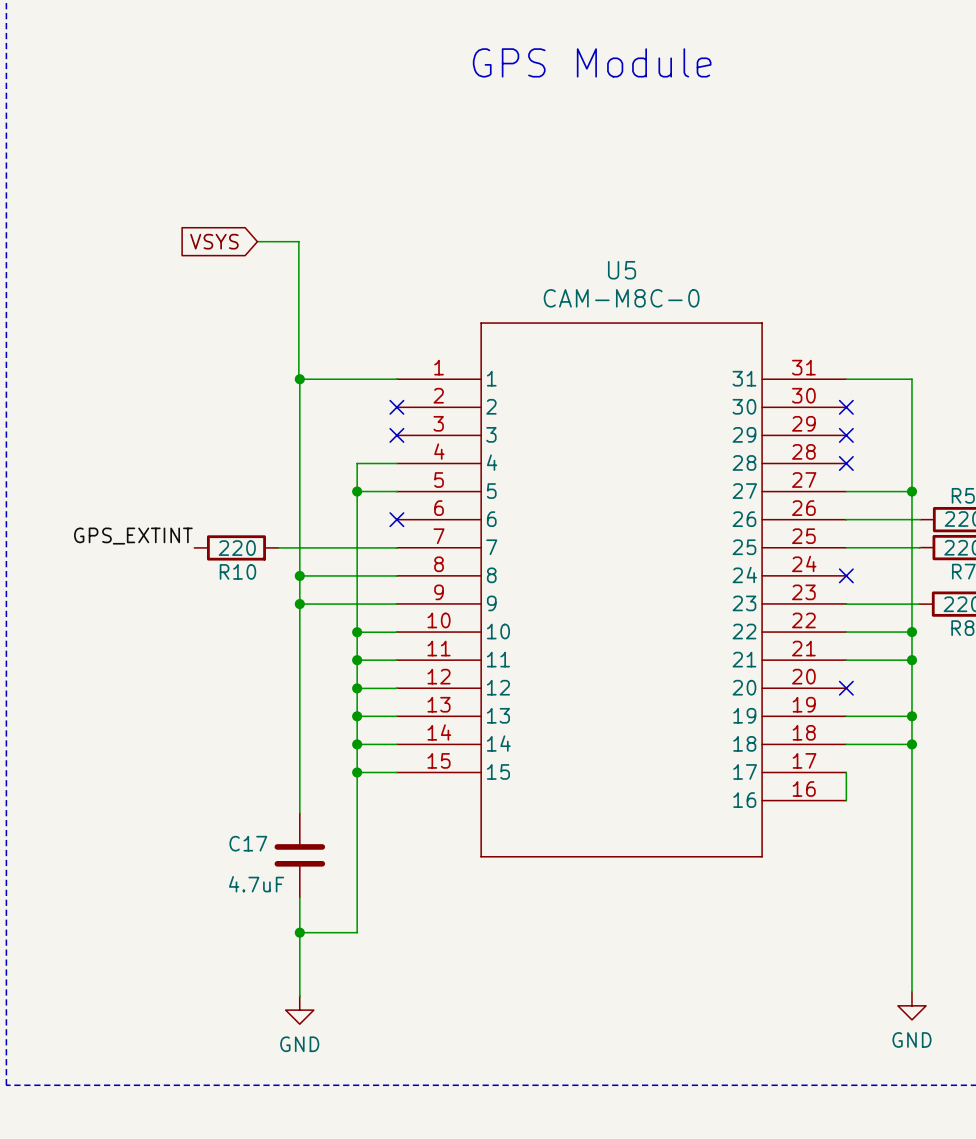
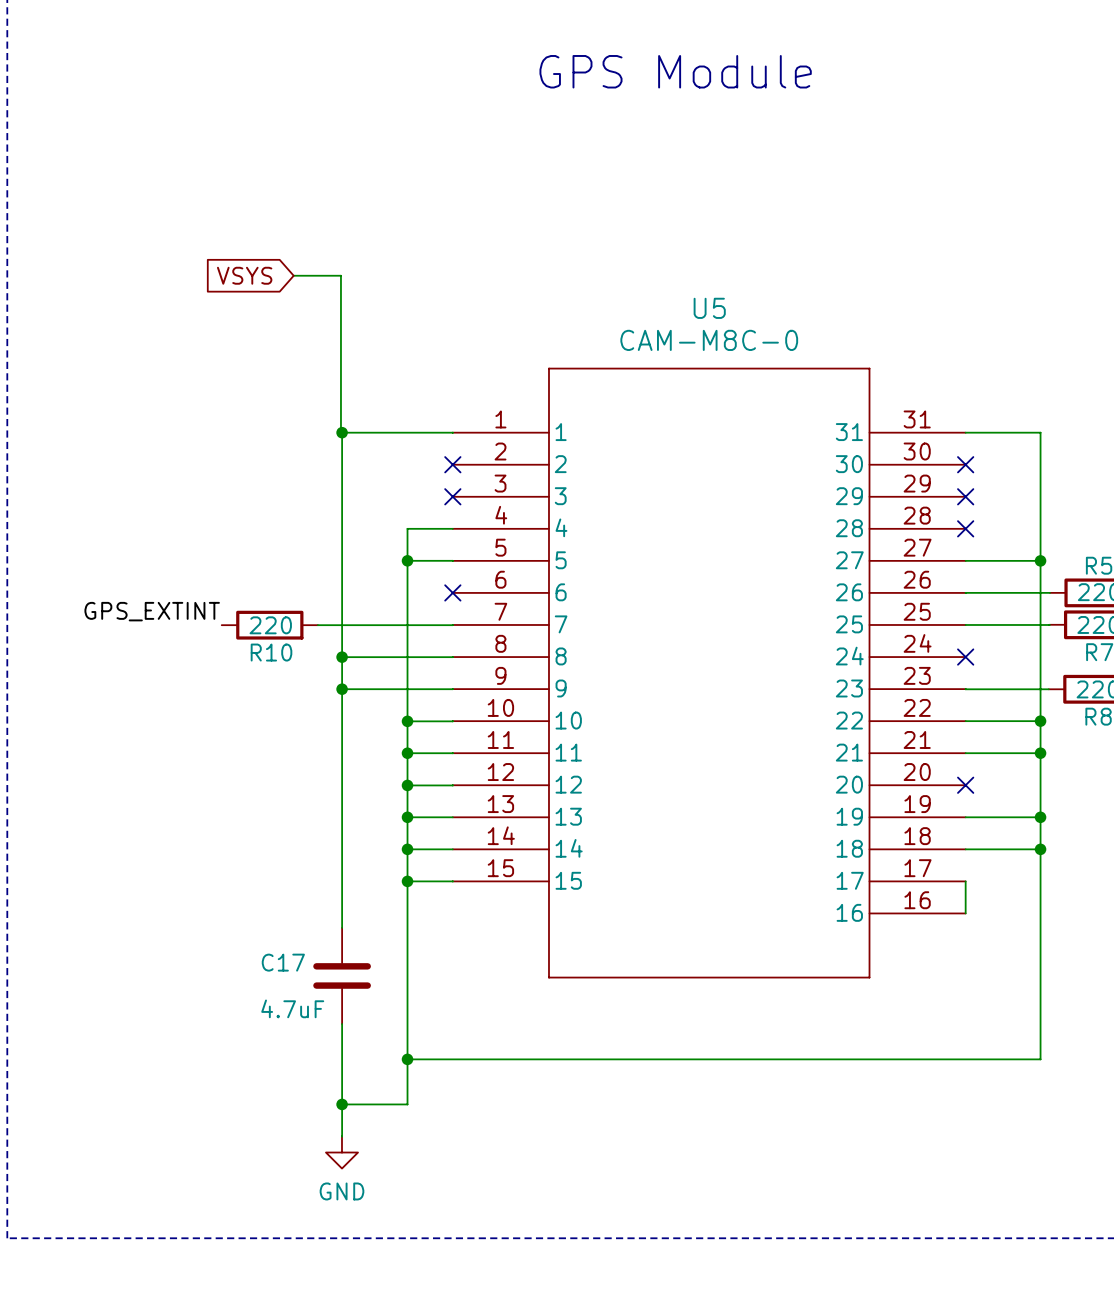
junction: none -> (407, 1059)
wire: (911, 928) (911, 991) -> (1040, 1059) (407, 1059)
wire: (299, 932) (357, 932) -> (342, 1104) (407, 1104) (407, 1064)
junction: (299, 932) -> none
junction: none -> (342, 1104)
power symbol: GND (911, 1005) -> none

